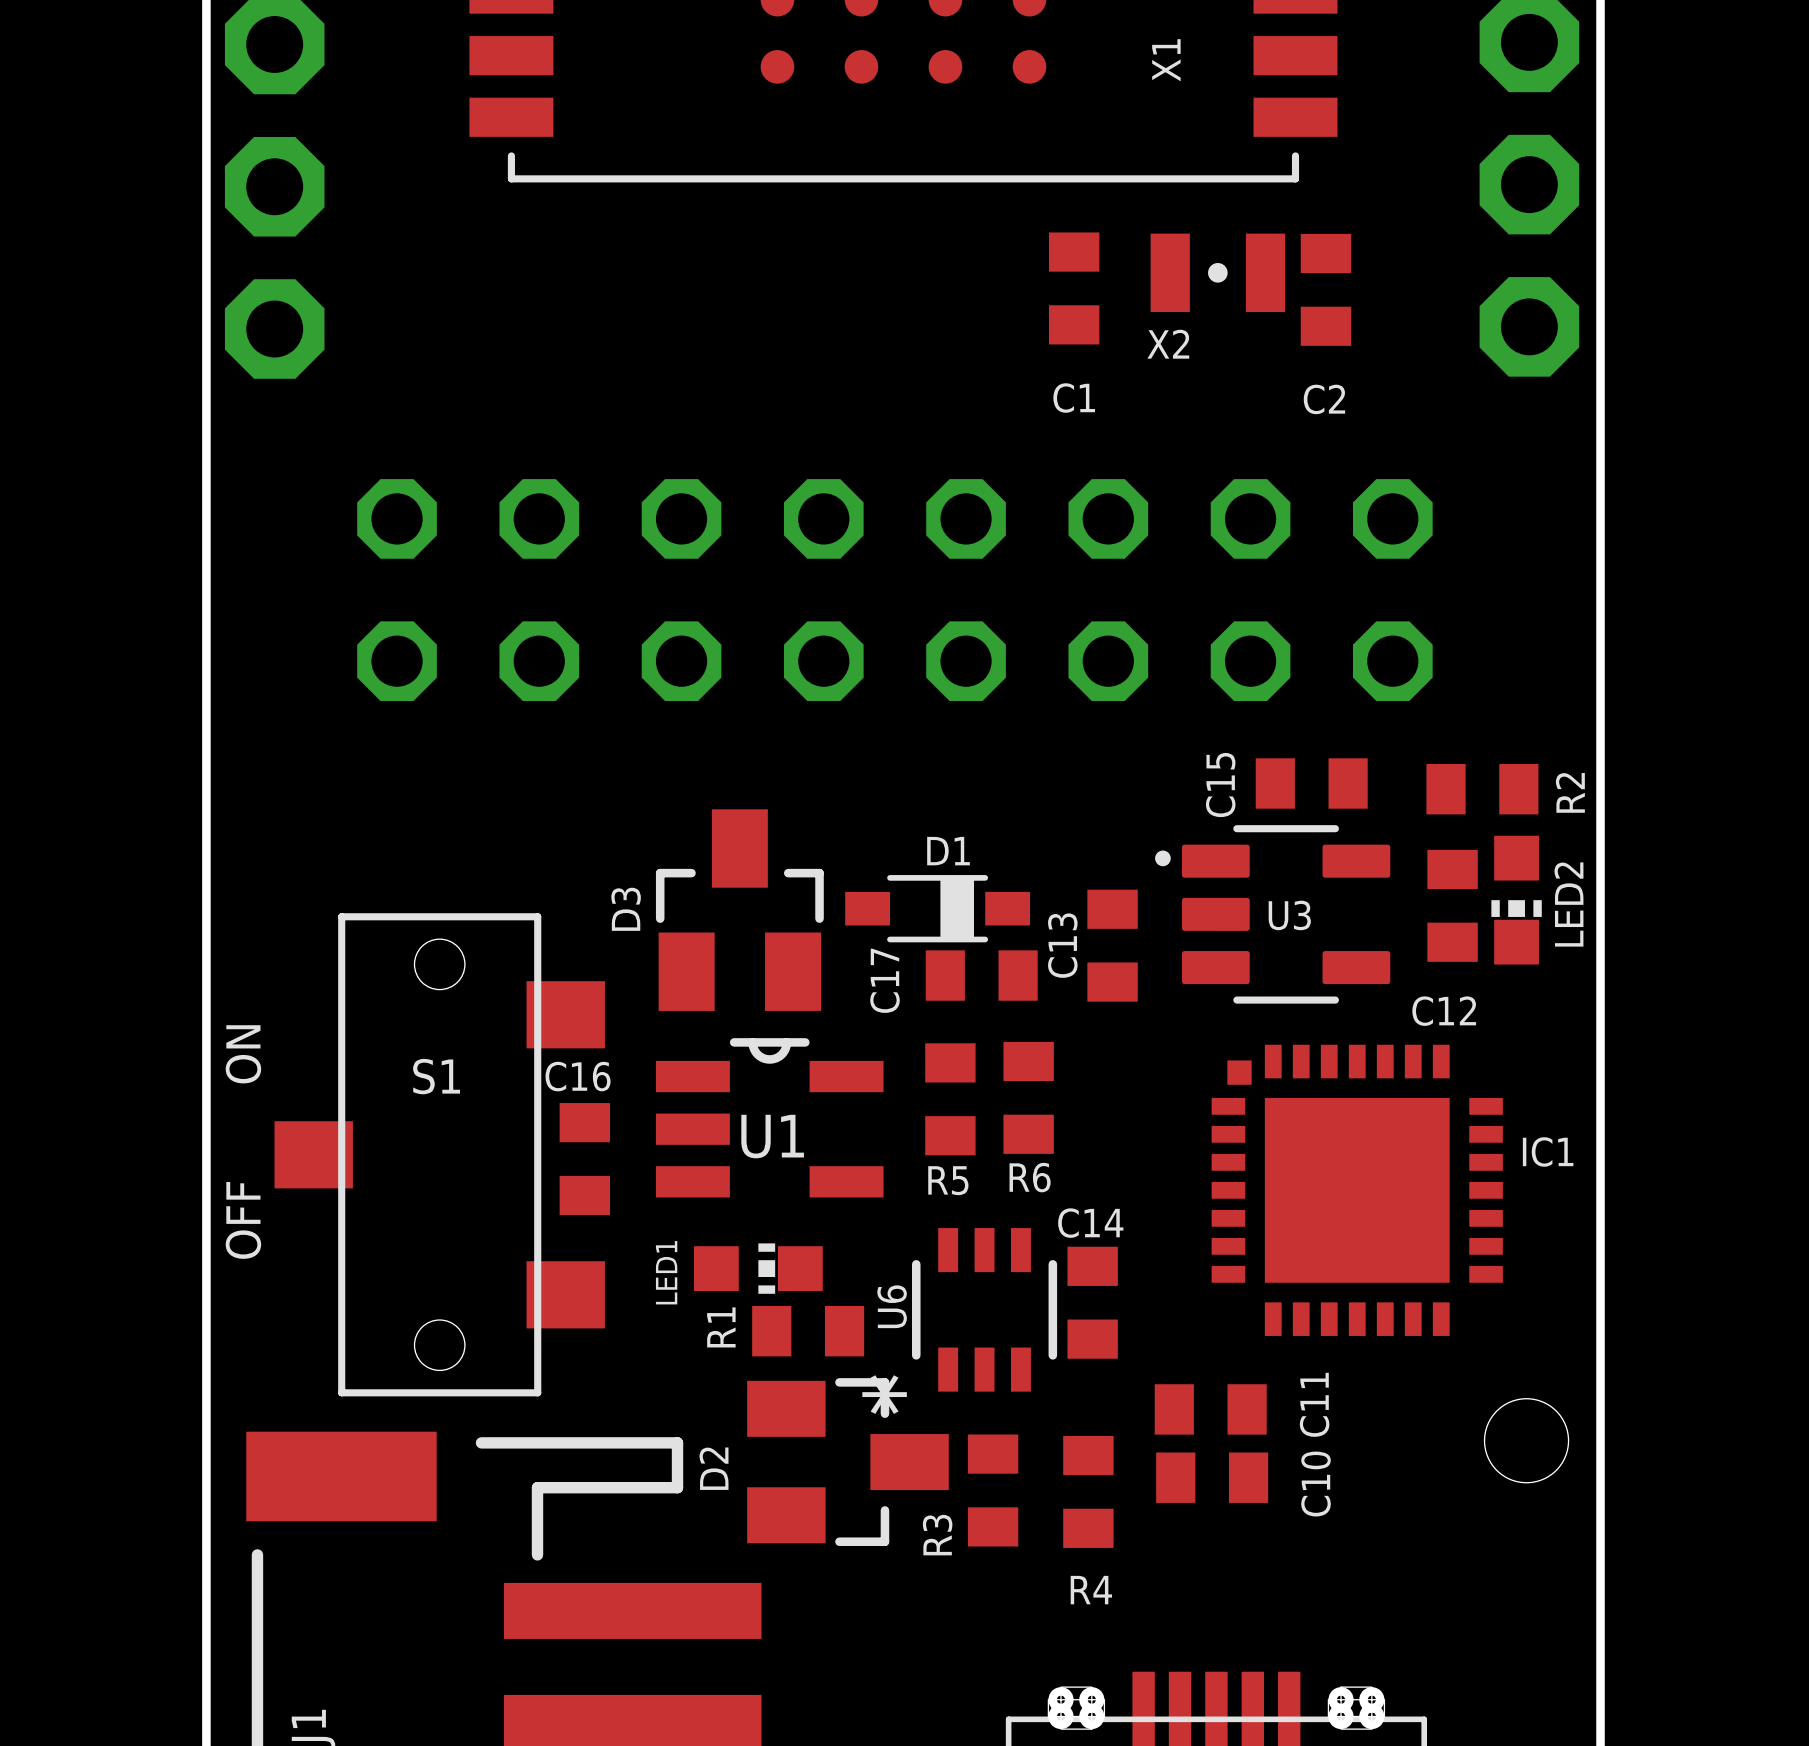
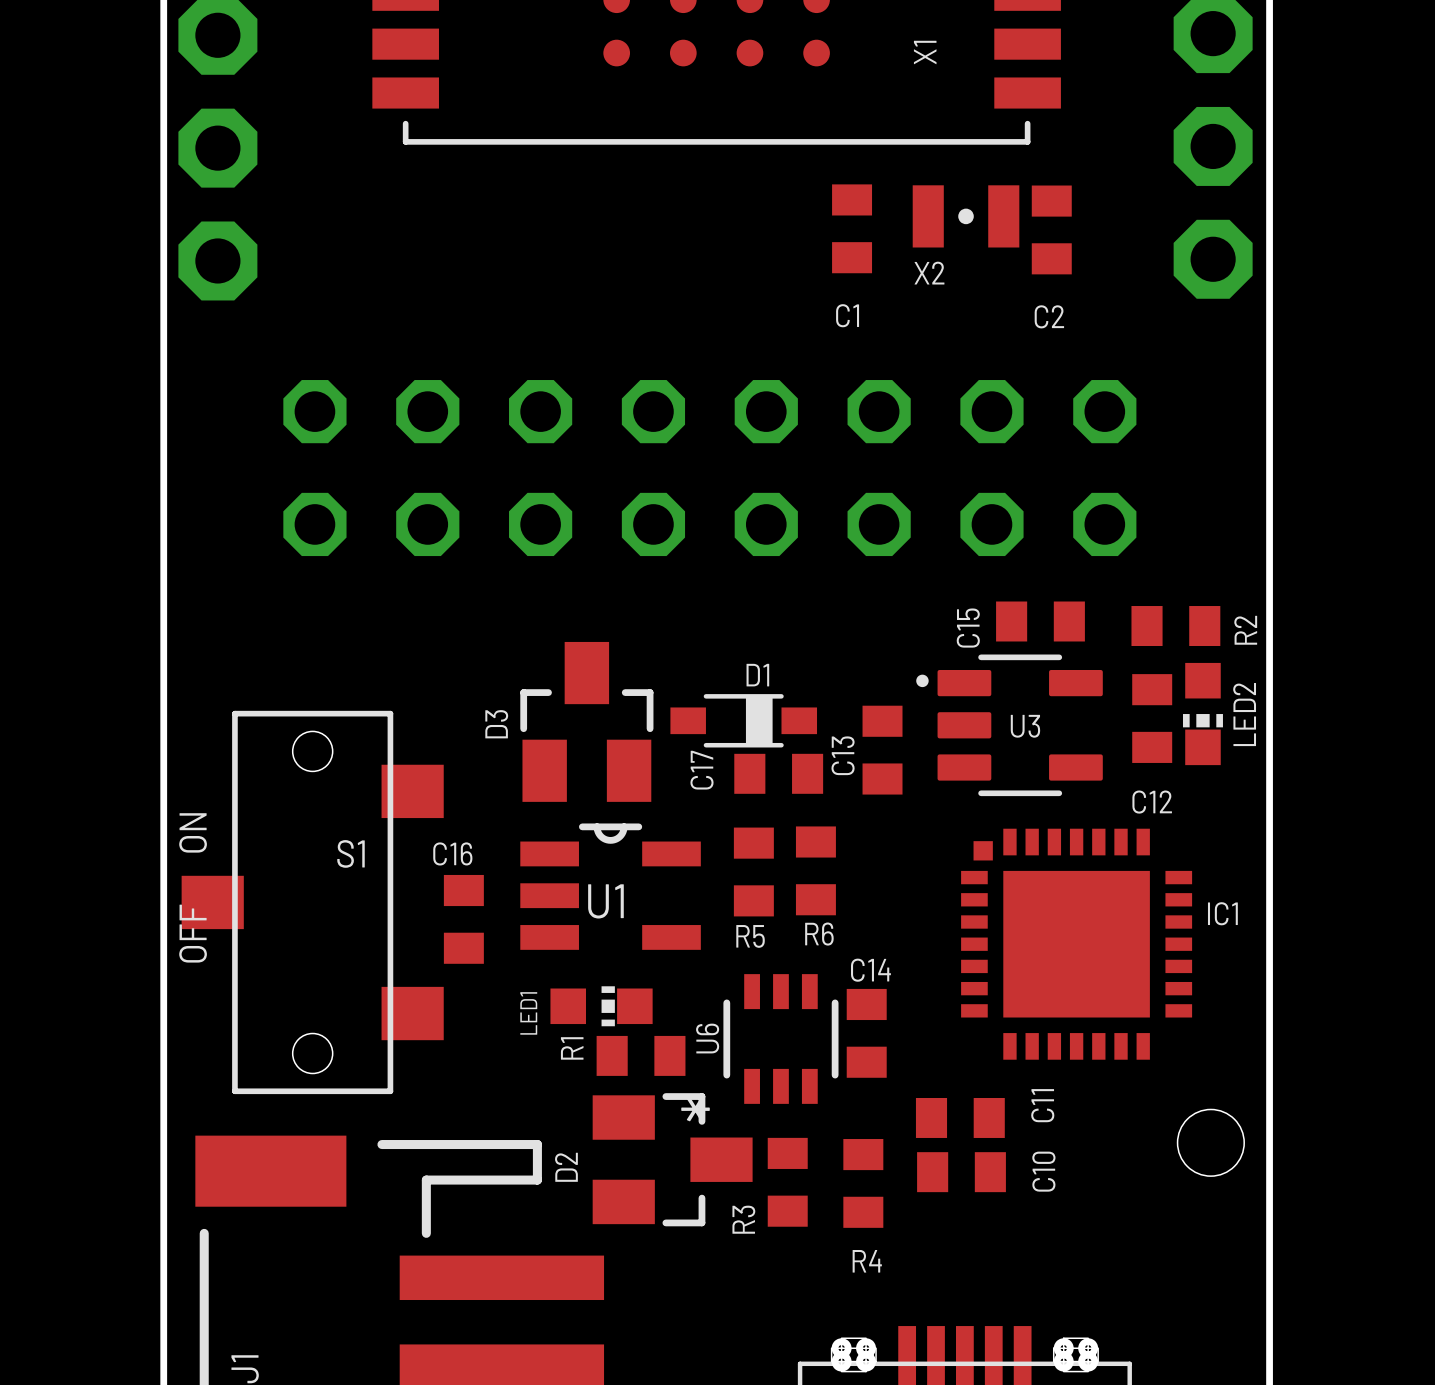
part position: (439, 1154) -> (312, 902)

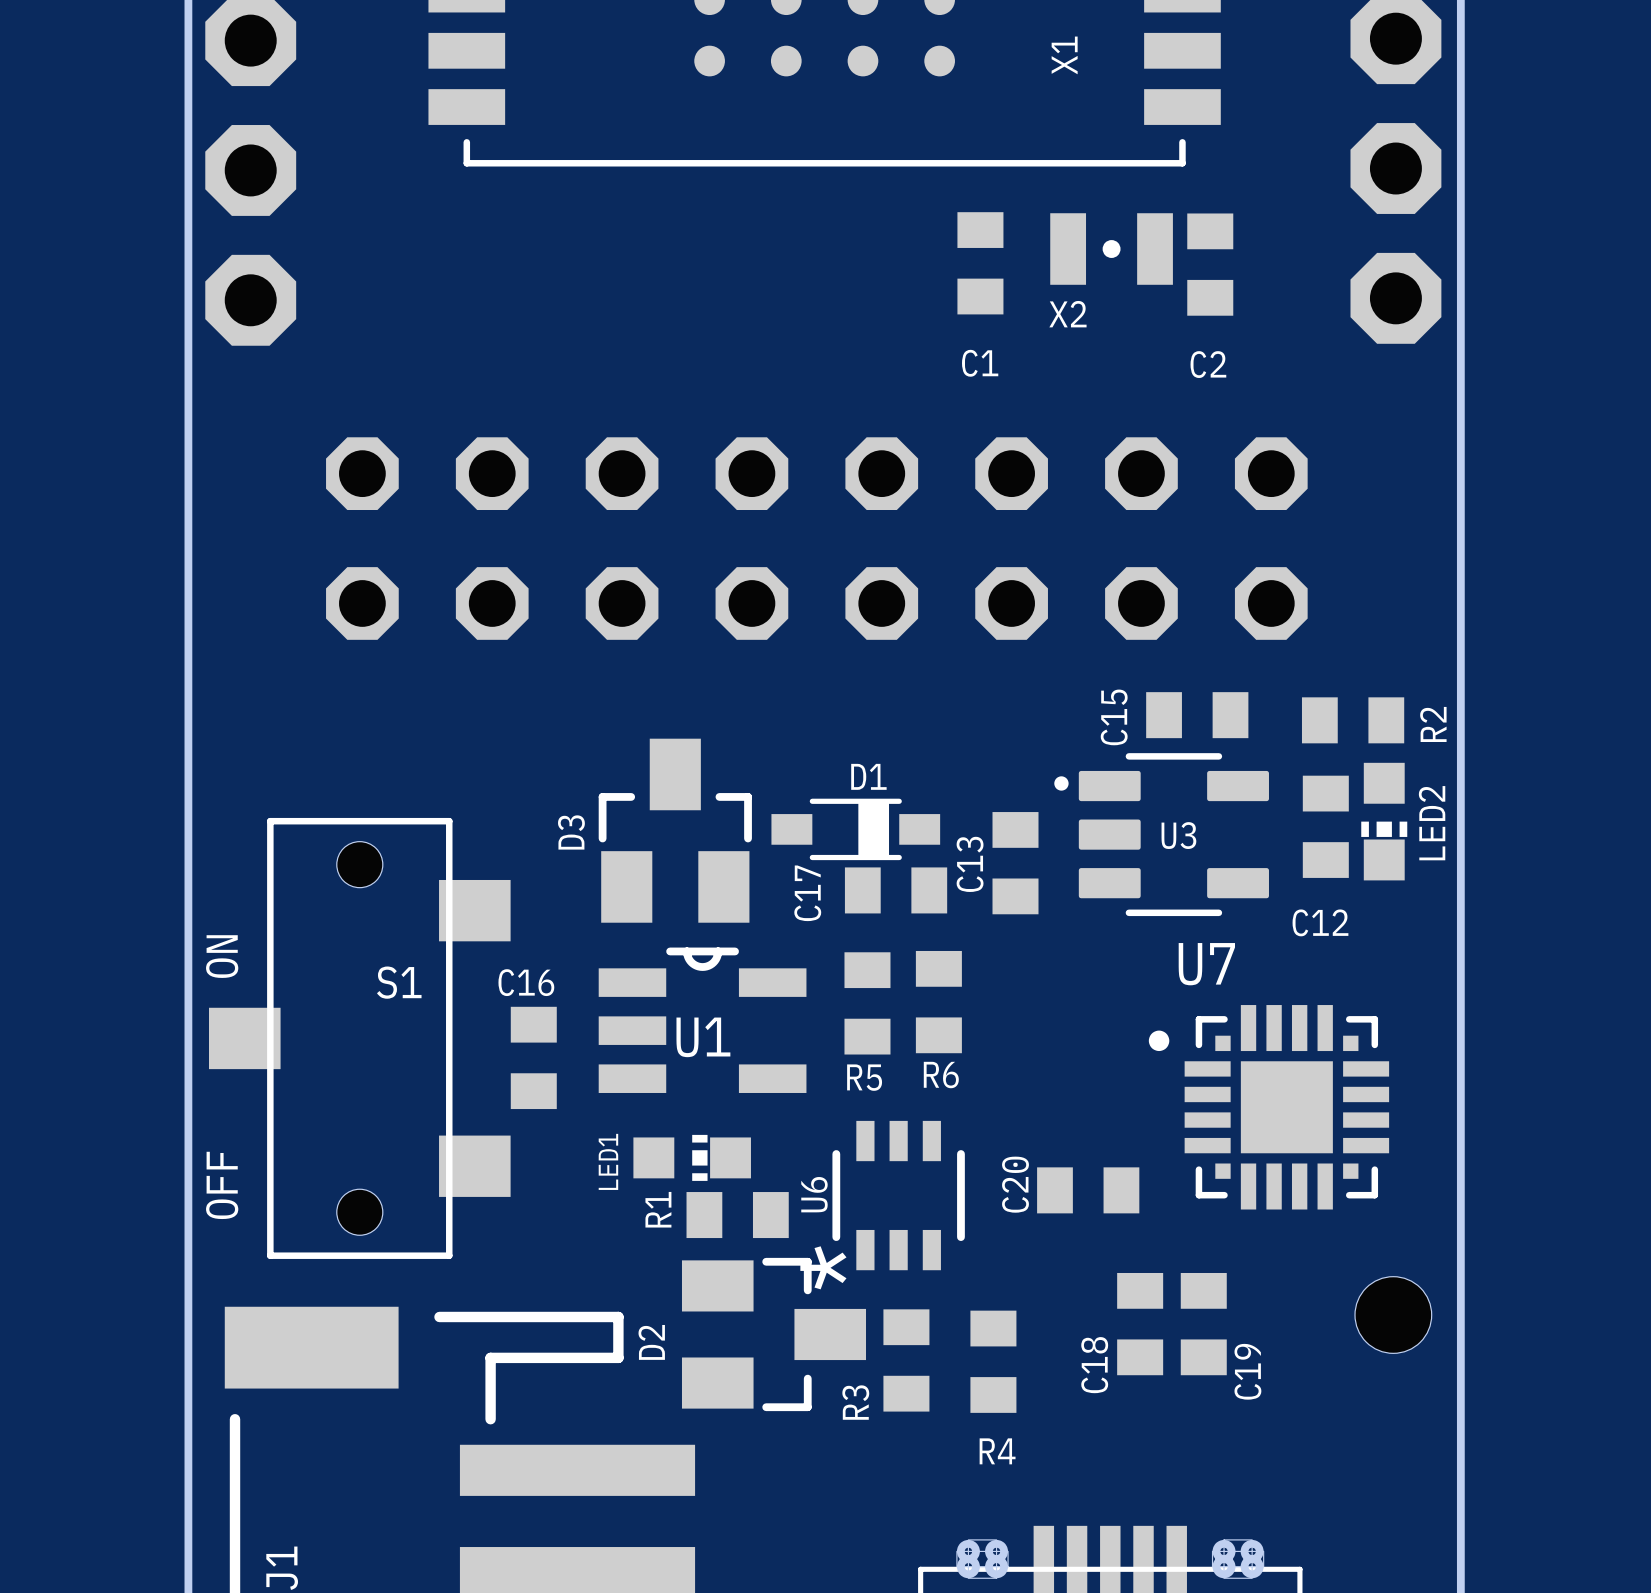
IC1: (1076, 944) -> none
U7: none -> (1268, 1107)
C14: (866, 1033) -> none
C20: none -> (1088, 1190)
C11: (960, 1117) -> none
C18: none -> (1140, 1324)
C19: none -> (1203, 1324)
C10: (961, 1172) -> none

